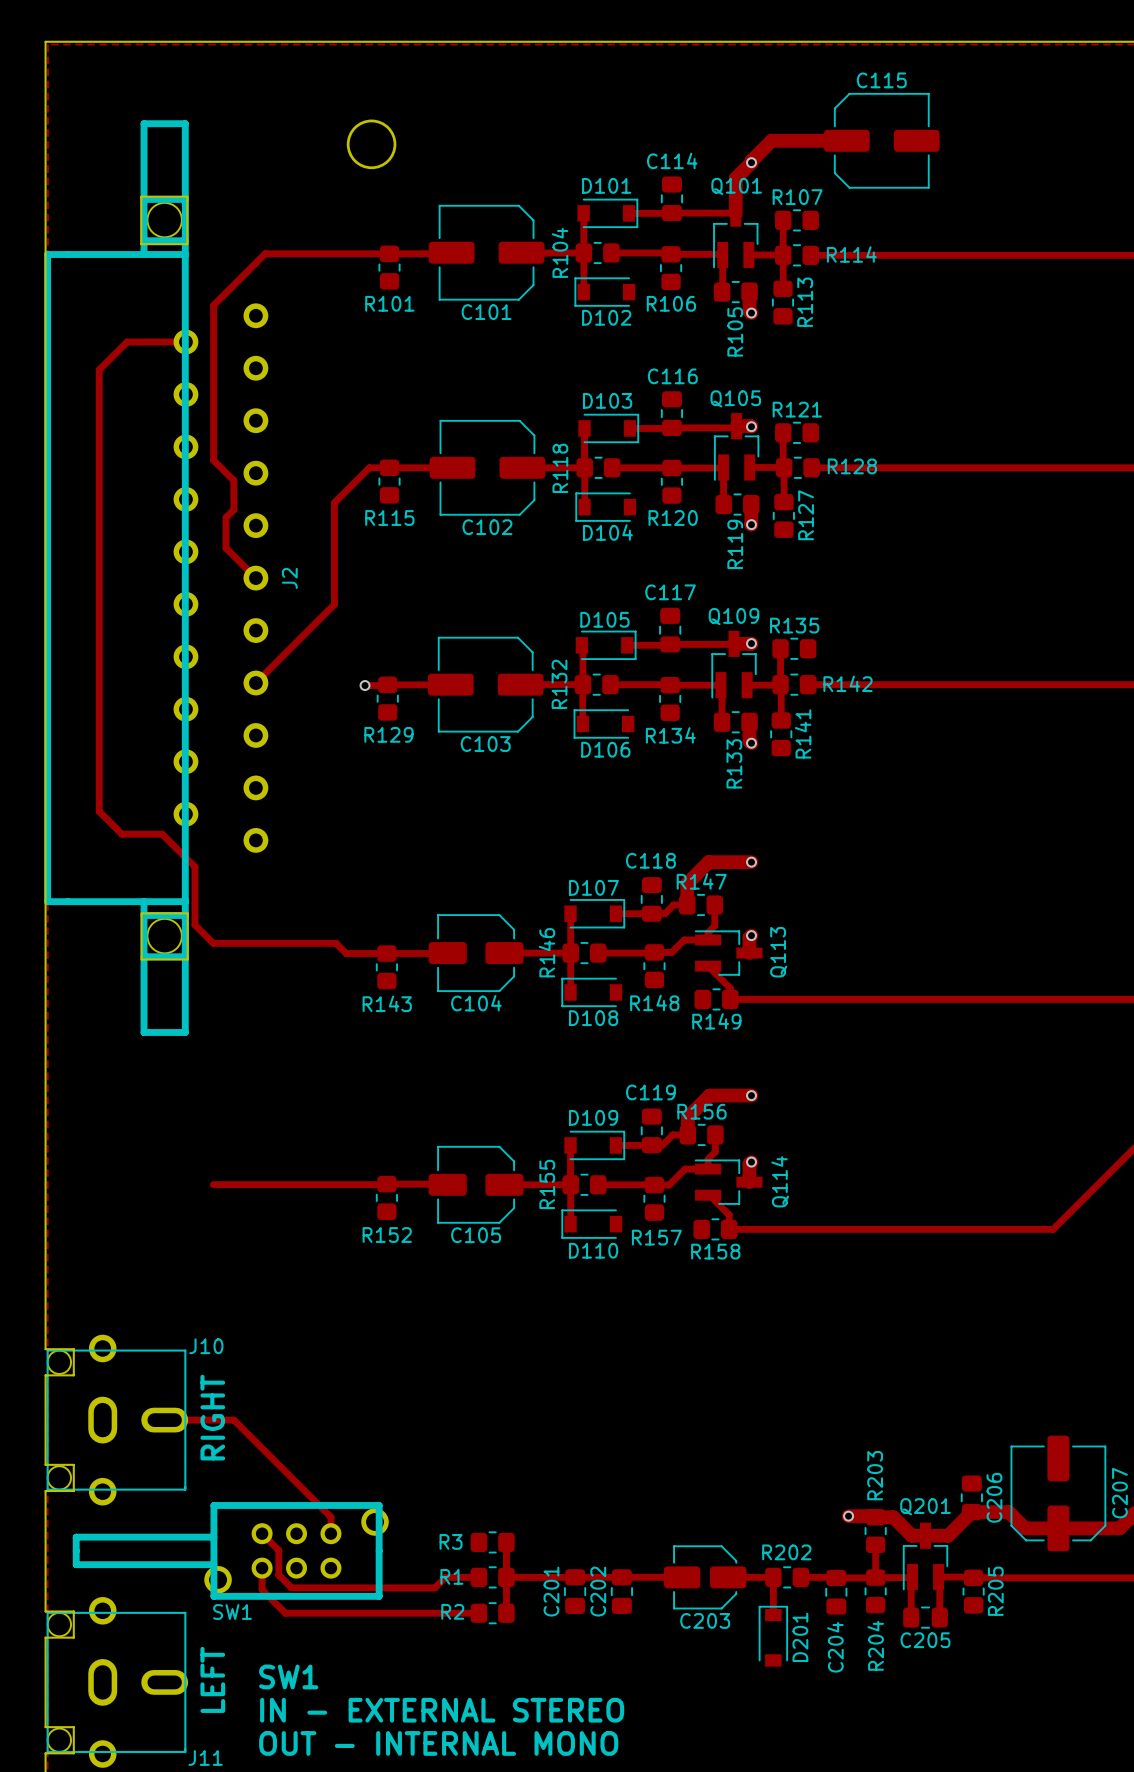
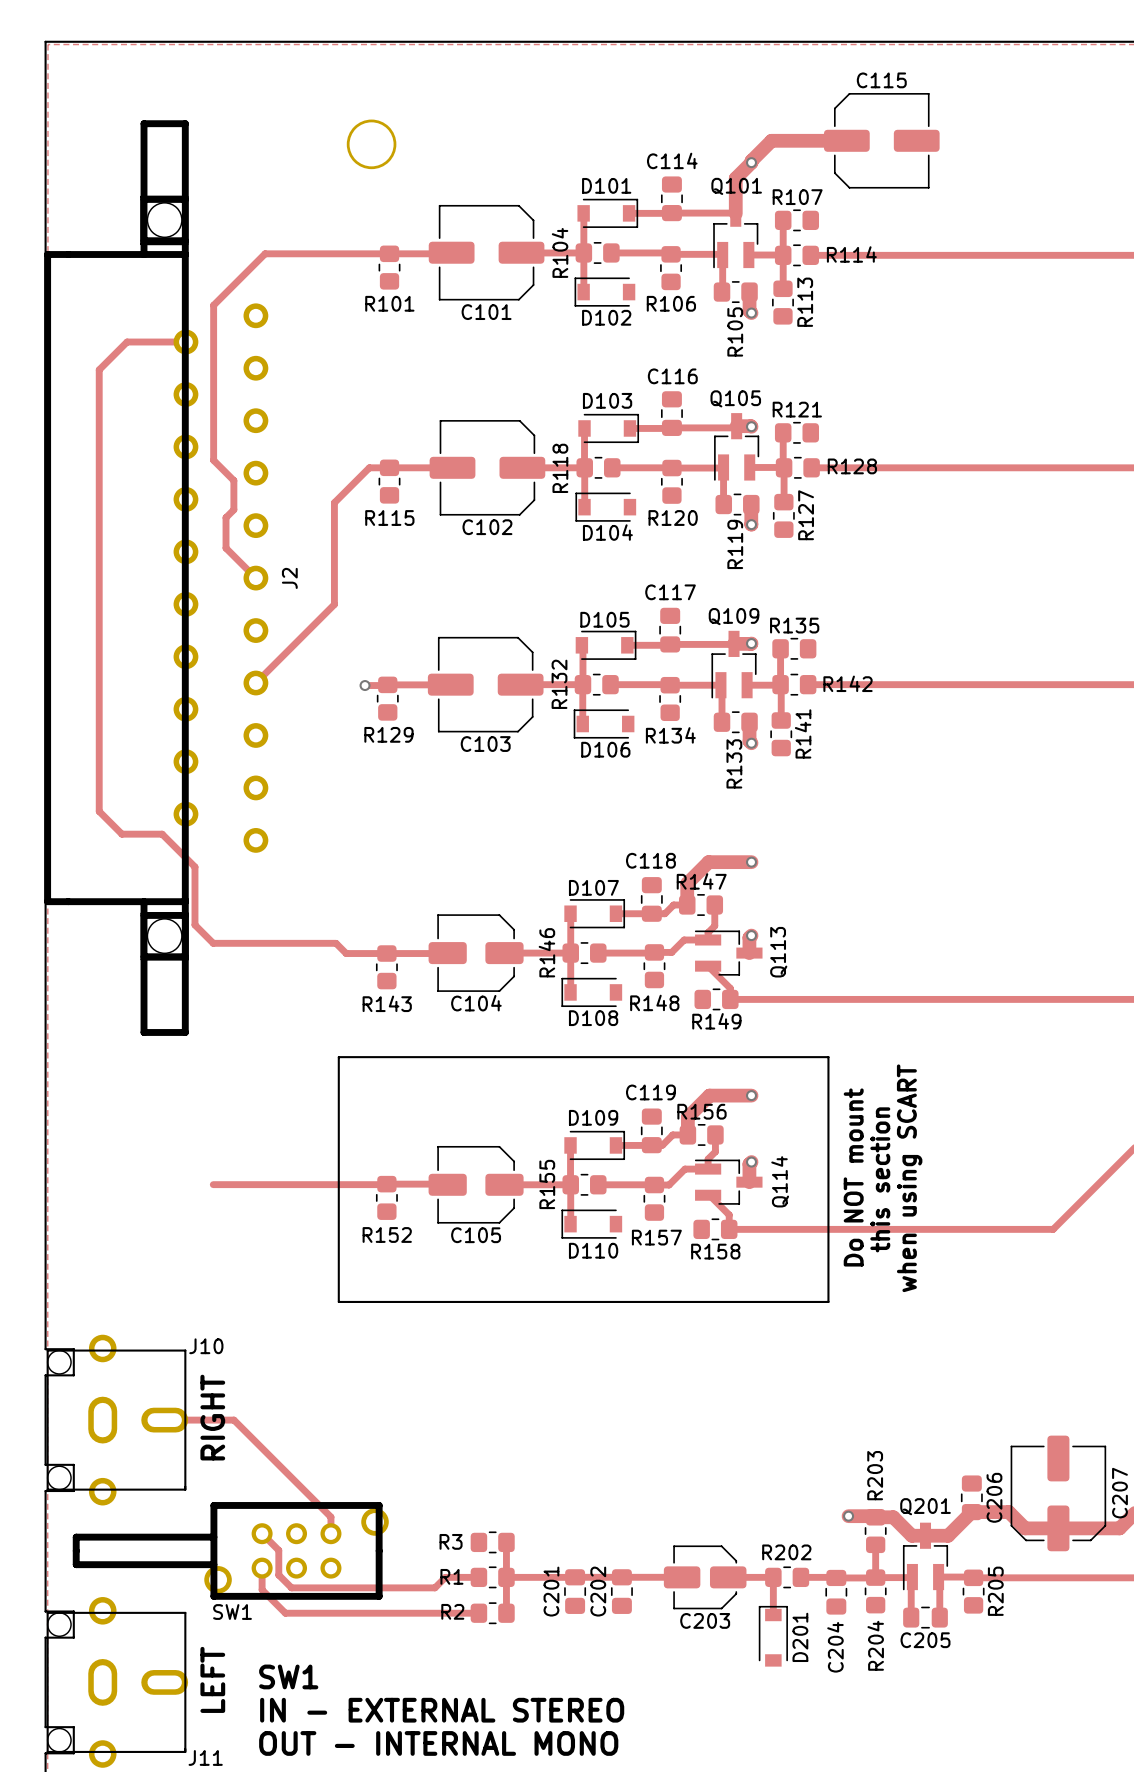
line: none -> (338, 1057) (338, 1301) (828, 1301) (828, 1057) (338, 1057)
text: none -> Do NOT mount (853, 1177)
text: none -> when using SCART (909, 1178)
text: none -> this section (880, 1179)

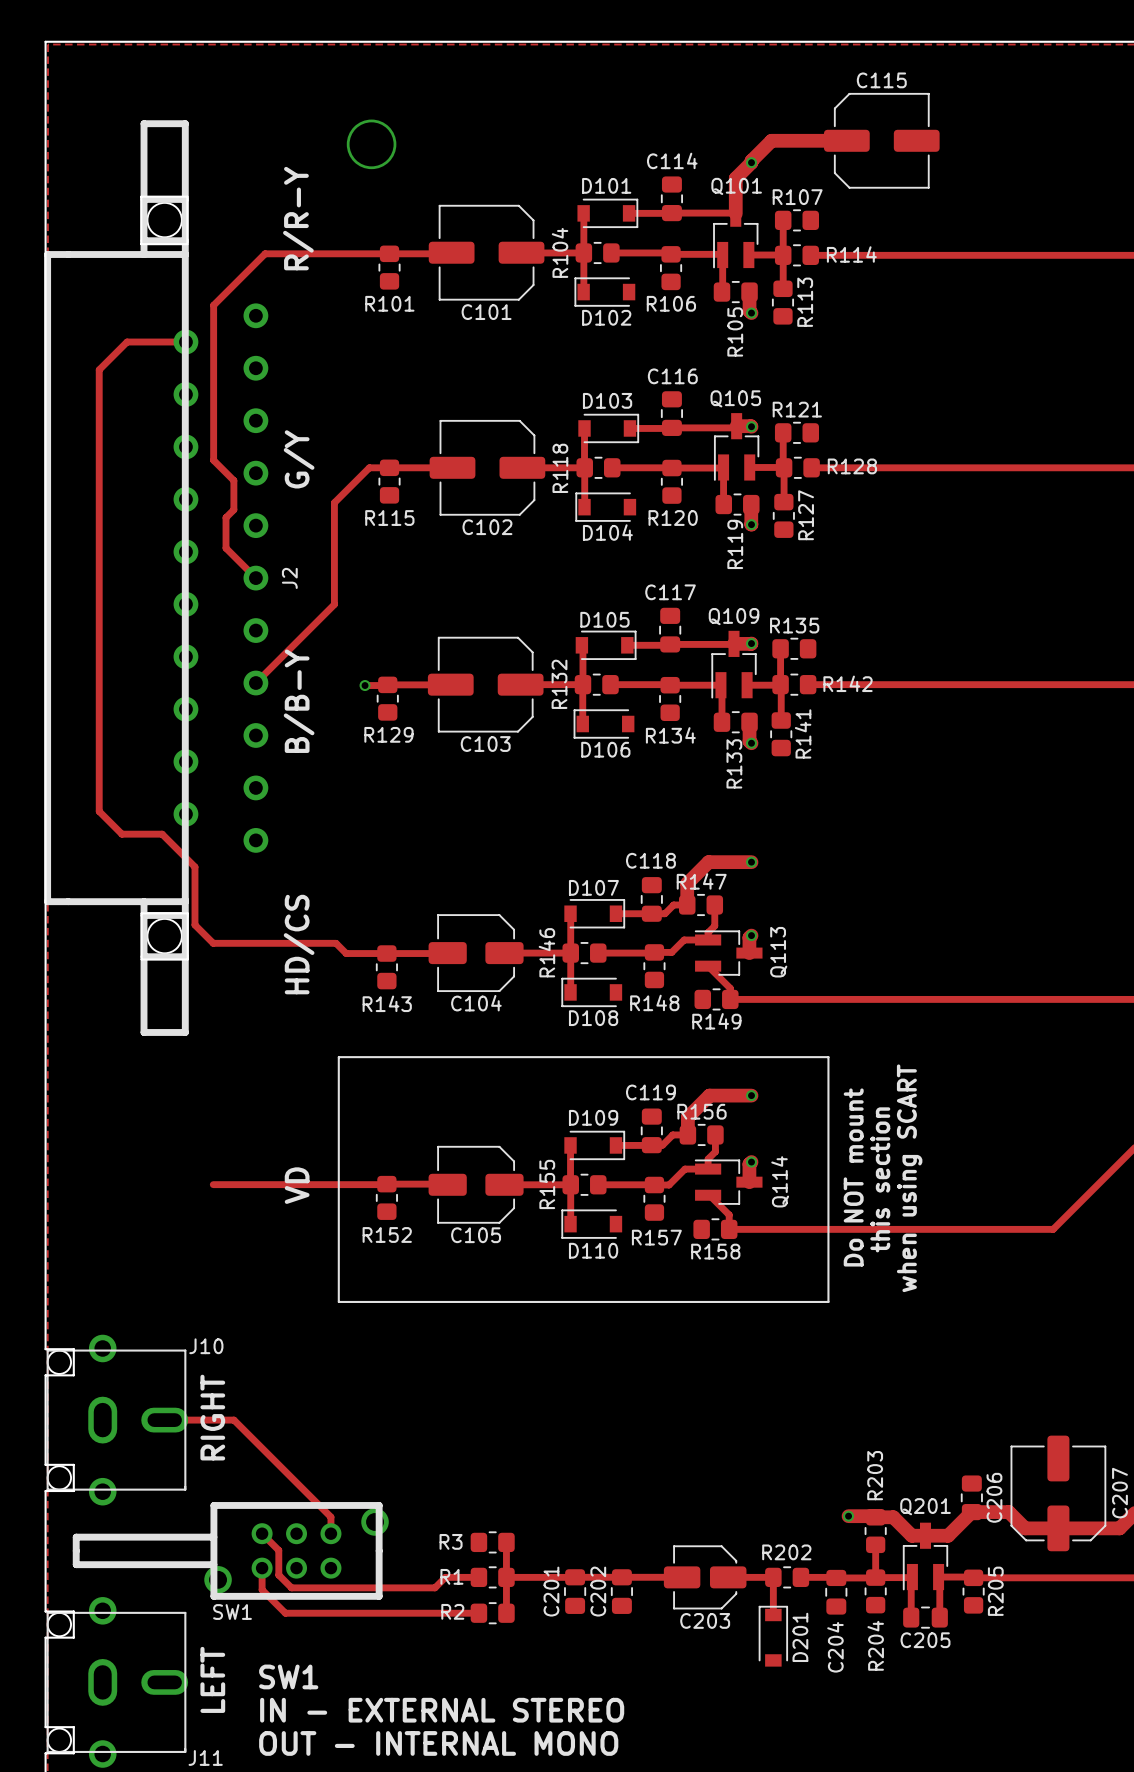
text: none -> R/R-Y (298, 218)
text: none -> G/Y (299, 459)
text: none -> B/B-Y (299, 701)
text: none -> HD/CS (299, 944)
text: none -> VD (297, 1185)

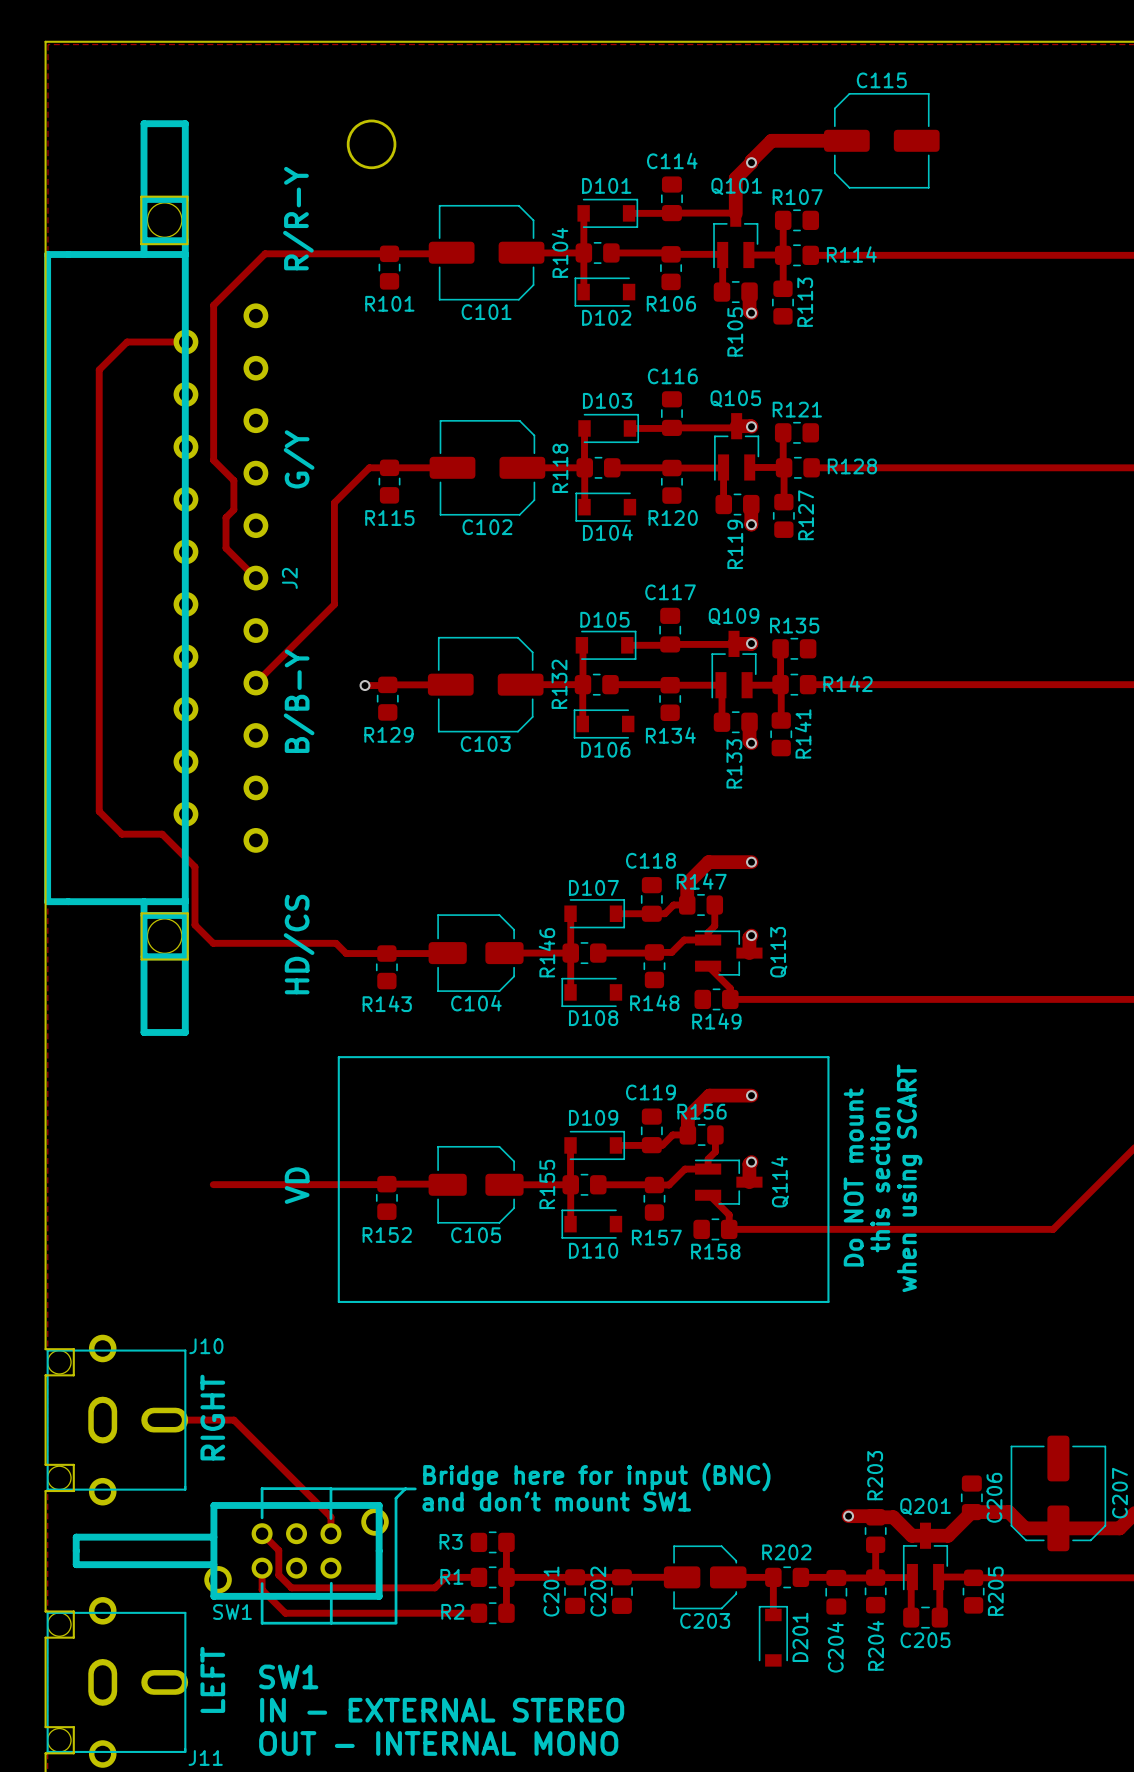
text: none -> Bridge here for input (BNC) (596, 1476)
line: none -> (330, 1488) (415, 1488)
line: none -> (405, 1488) (396, 1498) (396, 1622)
text: none -> and don't mount SW1 (556, 1501)
line: none -> (262, 1517) (262, 1488) (330, 1488) (330, 1518)
line: none -> (262, 1583) (262, 1623) (396, 1623)
line: none -> (331, 1583) (331, 1623)

